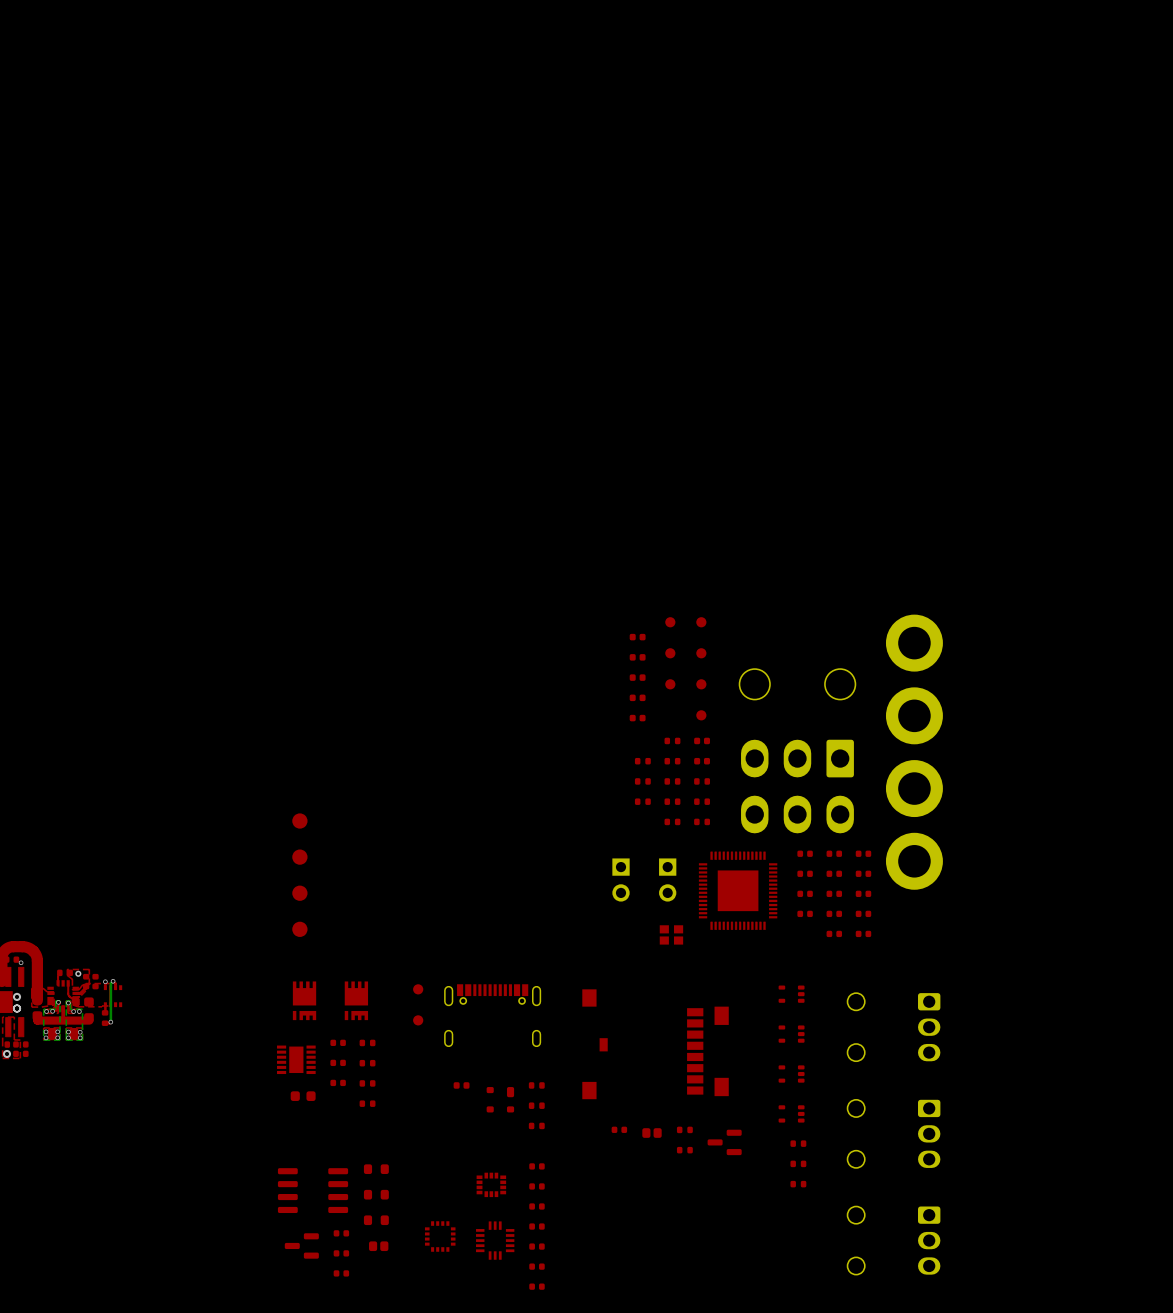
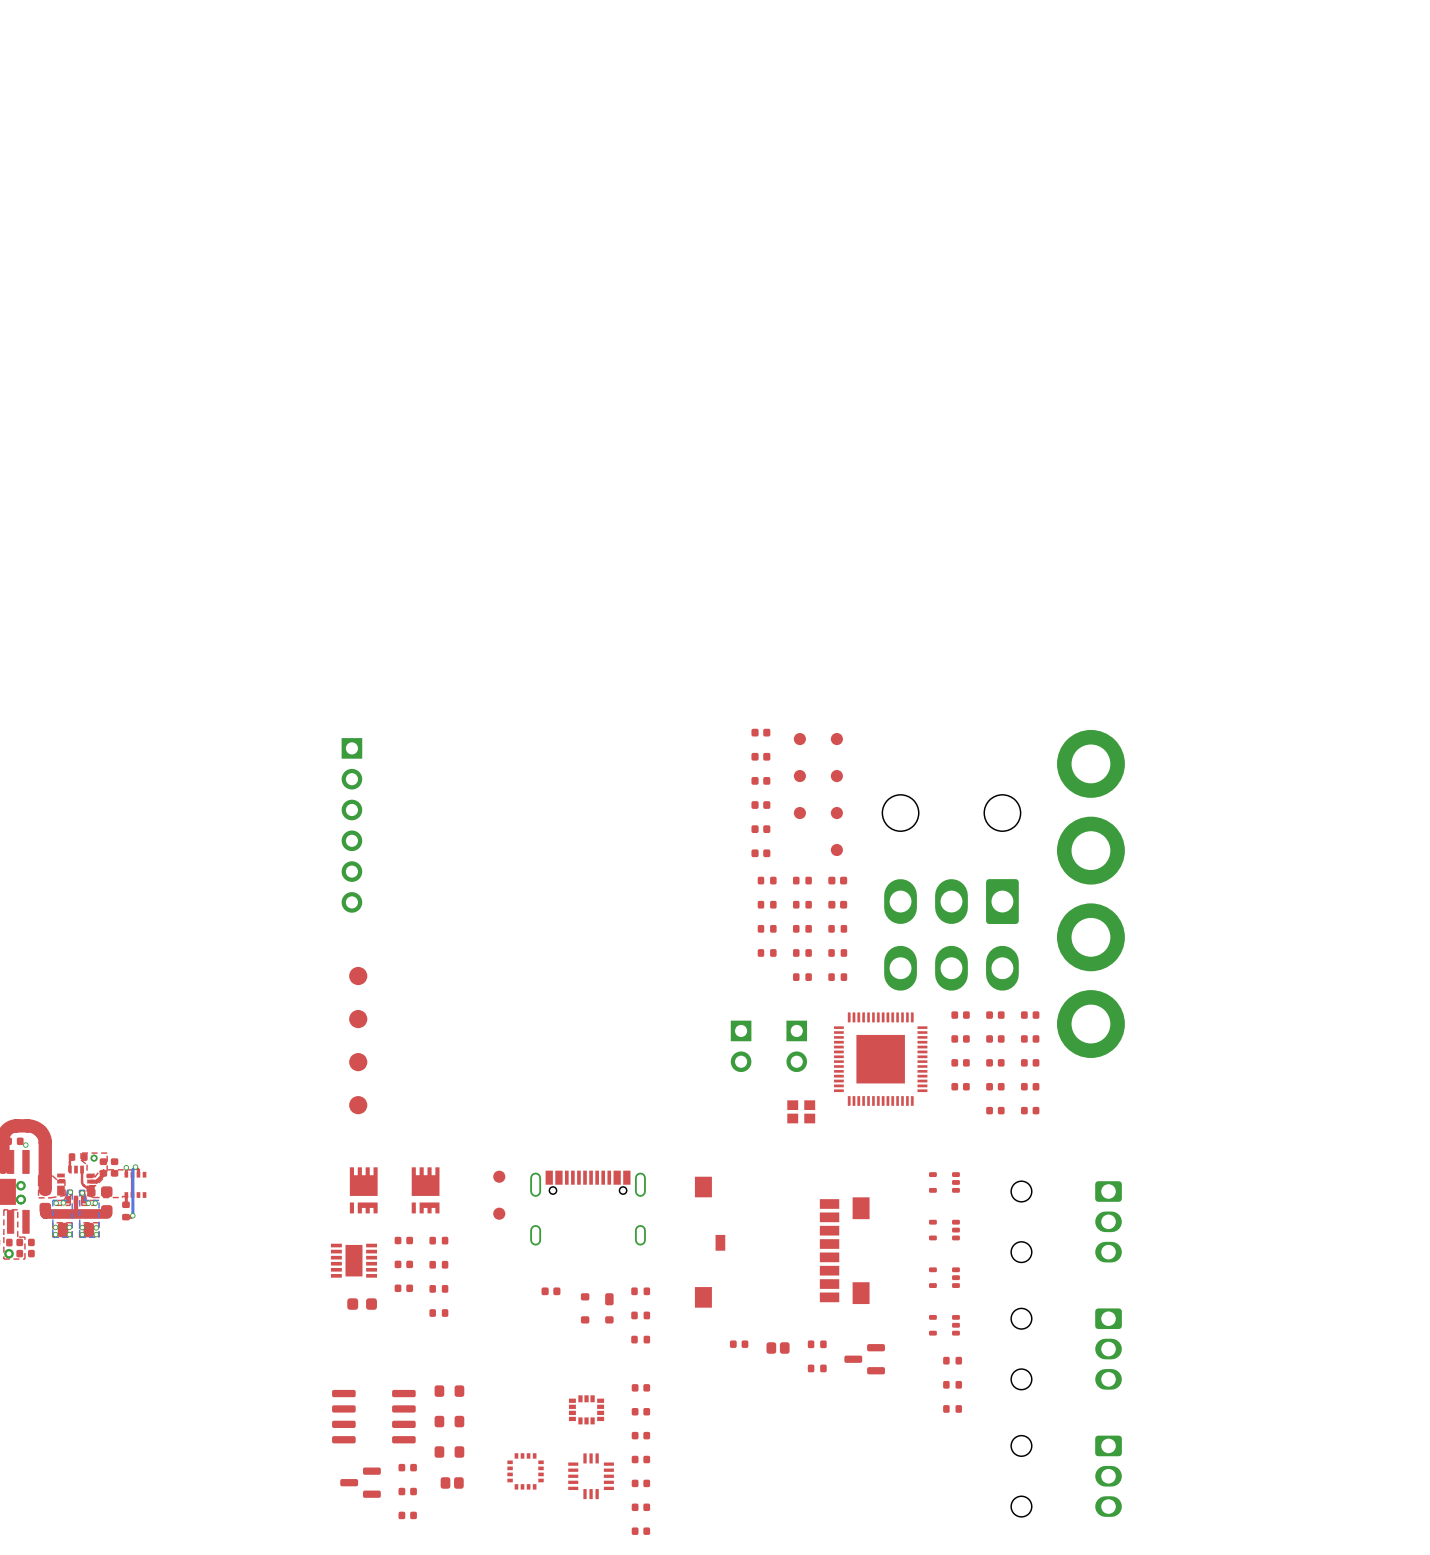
part: none -> (760, 732)
part: none -> (351, 825)
part: none -> (767, 880)

